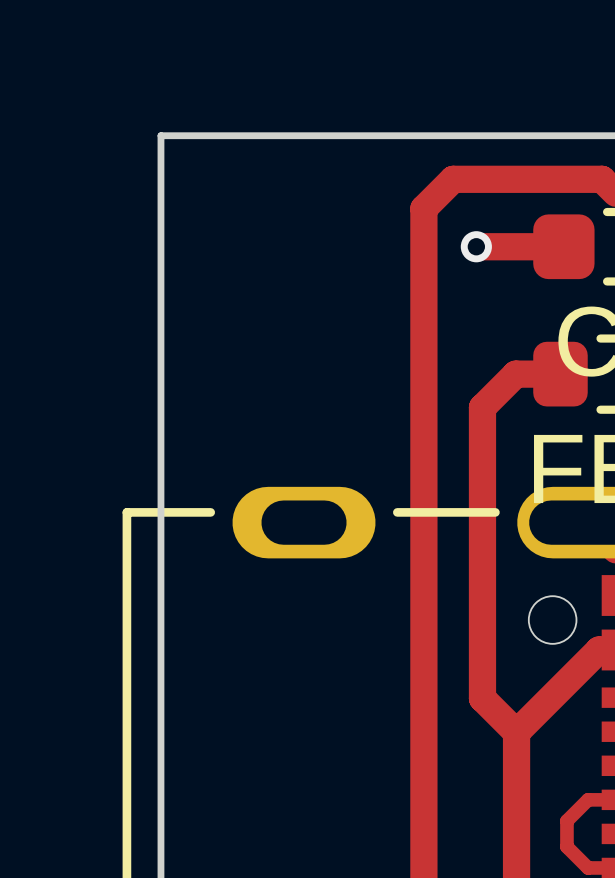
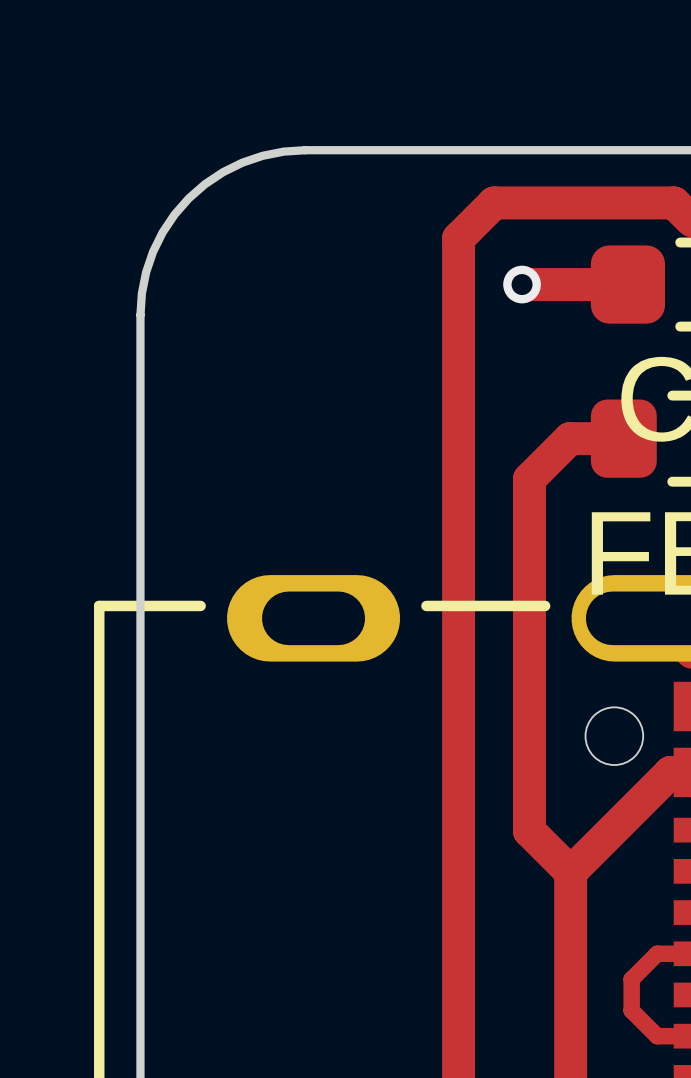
board edge: (297, 135) (160, 135) (160, 271) -> (305, 150) (262, 155) (242, 162) (222, 172) (188, 198) (174, 214) (153, 251) (141, 293) (140, 315)

